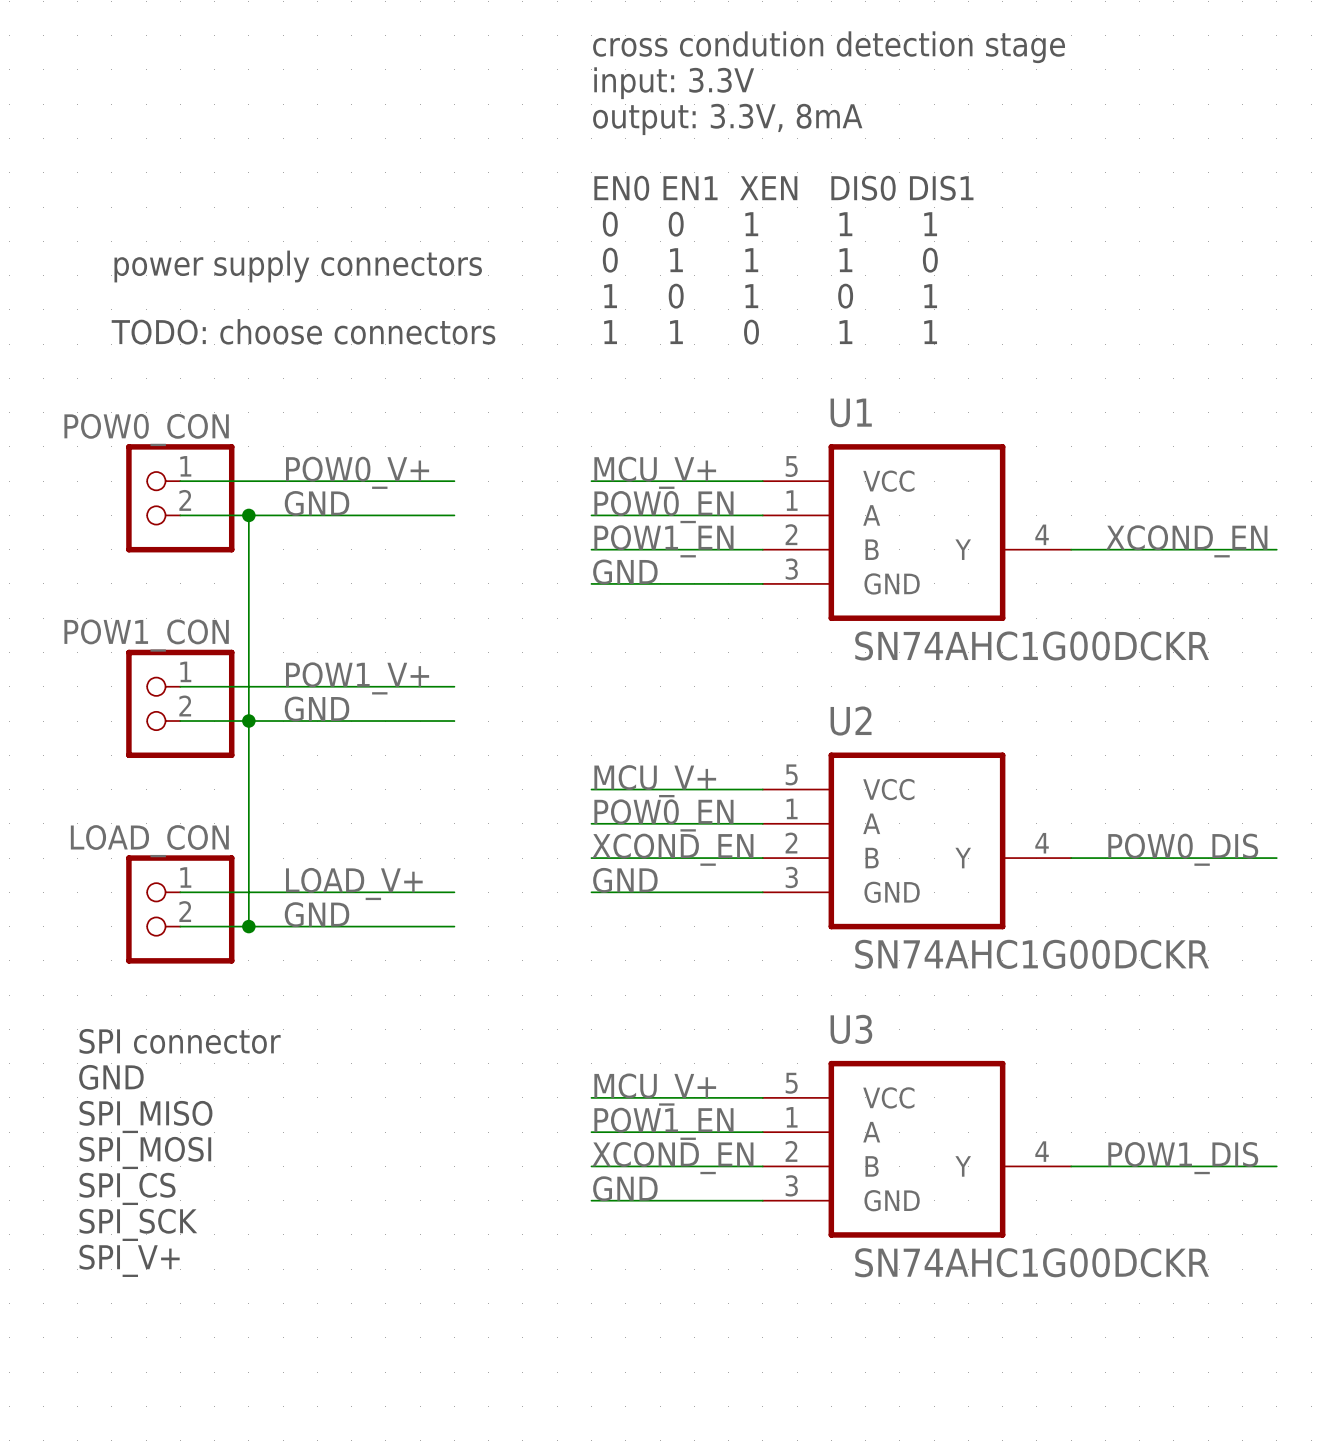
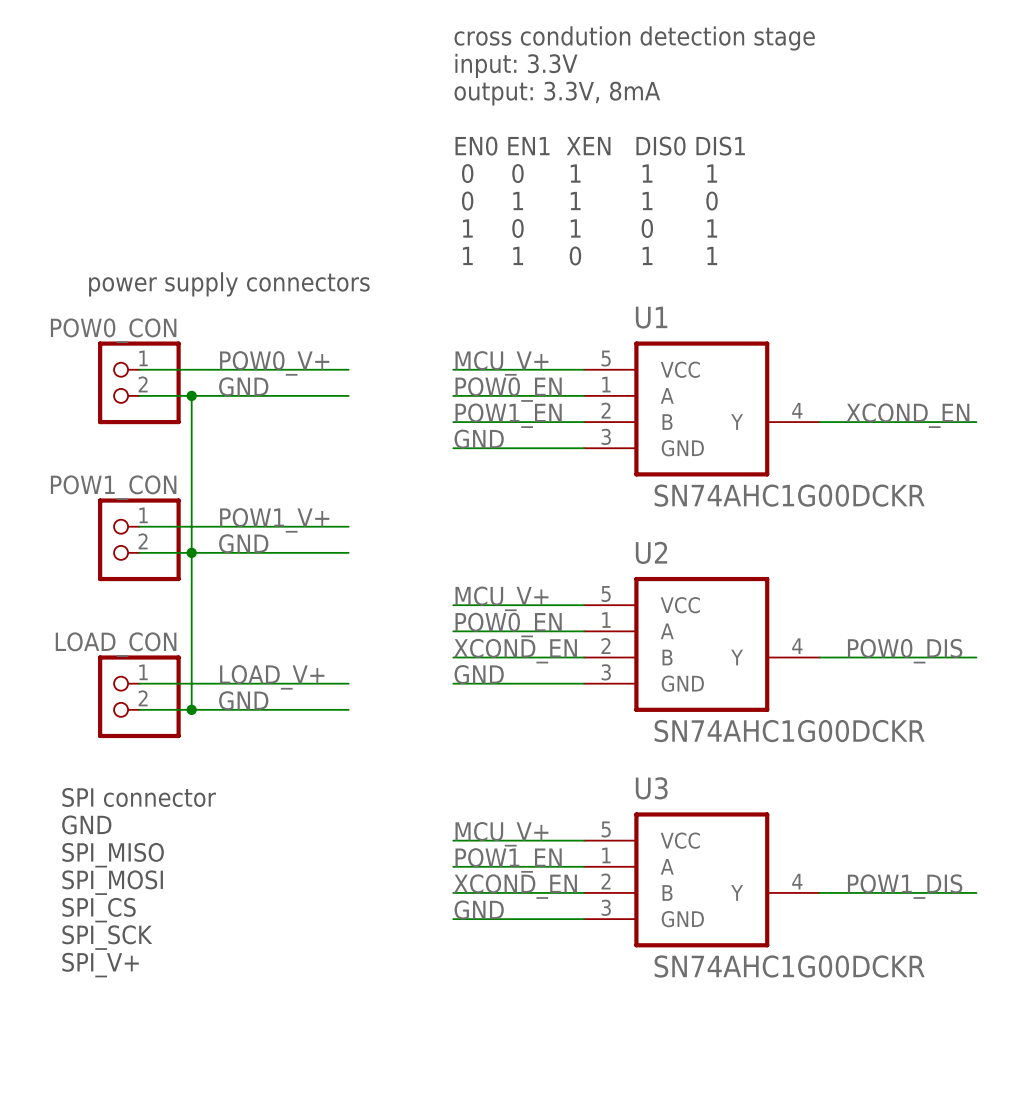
text position: power supply connectors (298, 266) -> power supply connectors (229, 284)
text: TODO: choose connectors (303, 331) -> none

